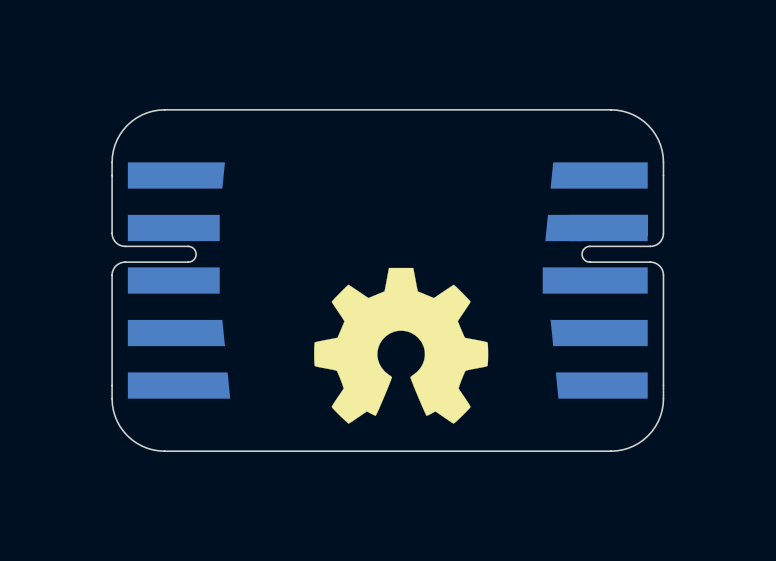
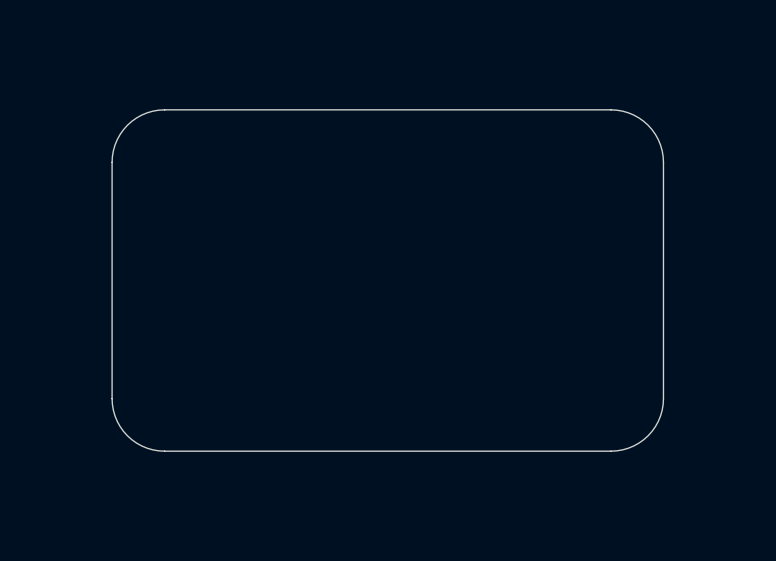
board edge: none -> (112, 175) (112, 385)
board edge: none -> (663, 175) (663, 385)
drawing: [314, 267, 489, 424] -> none
part: (170, 280) -> none
part: (603, 280) -> none

